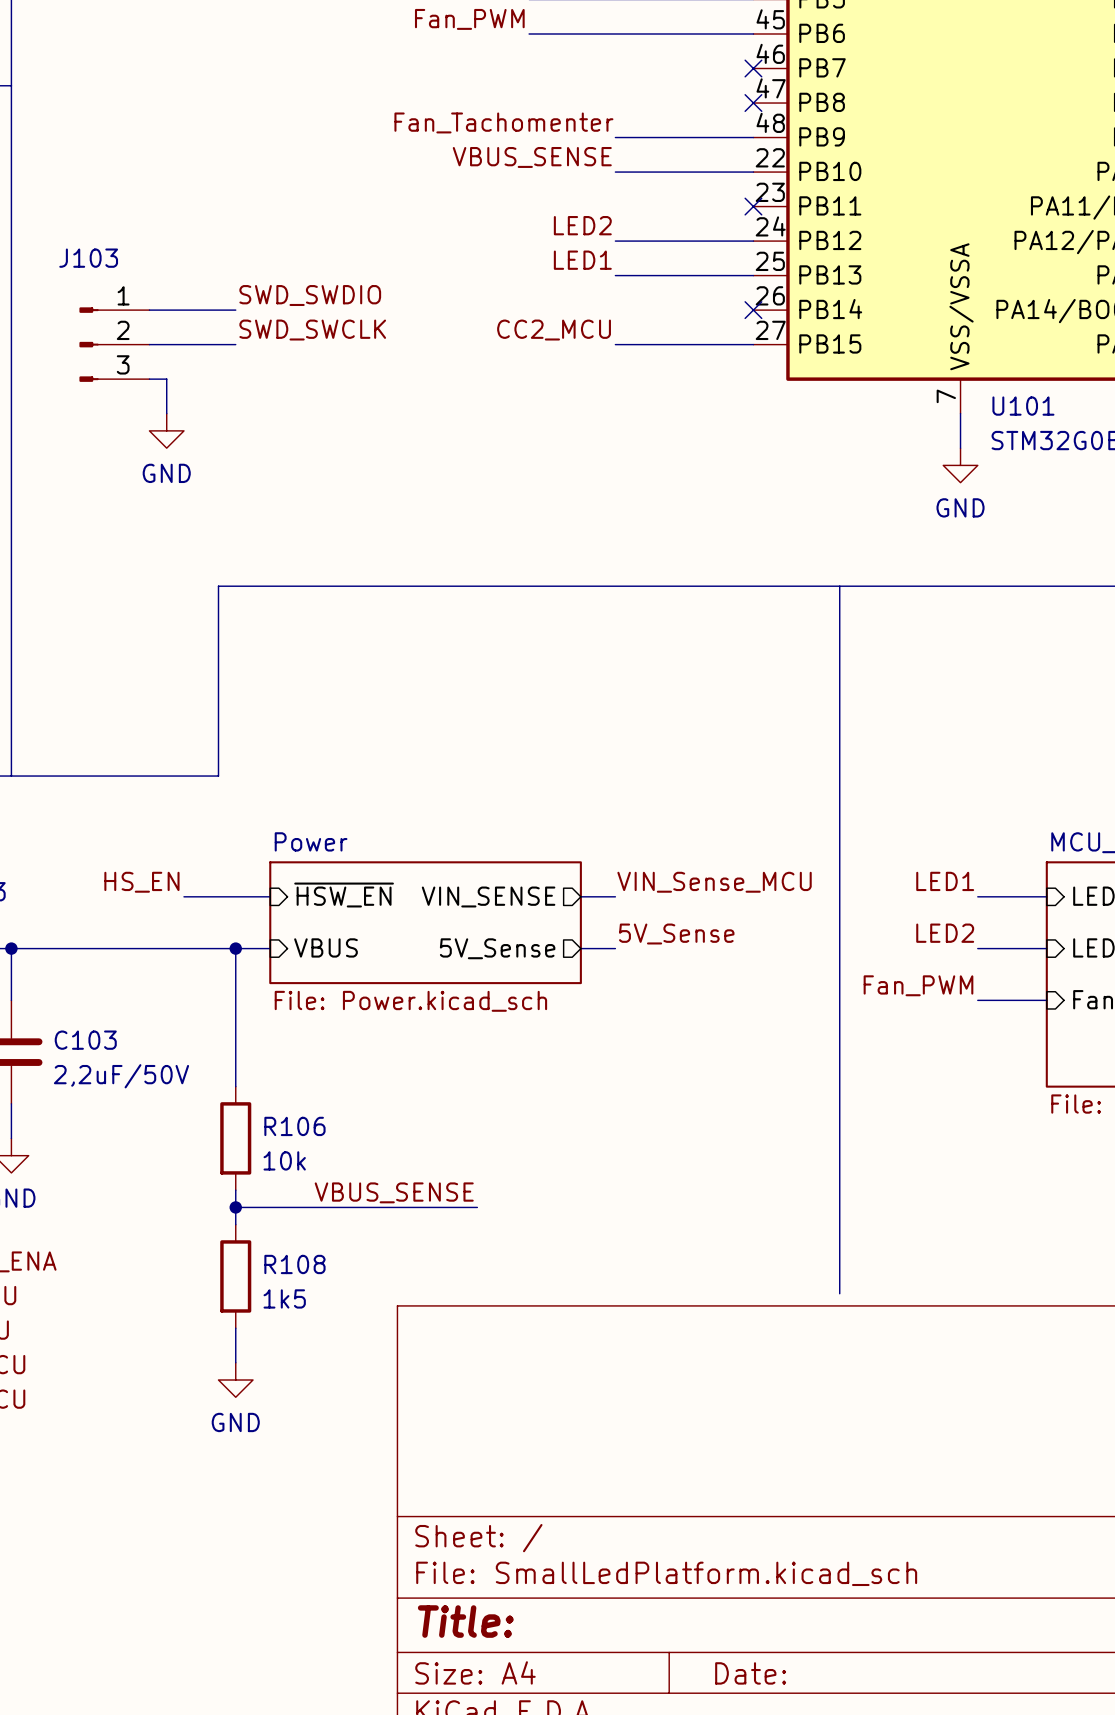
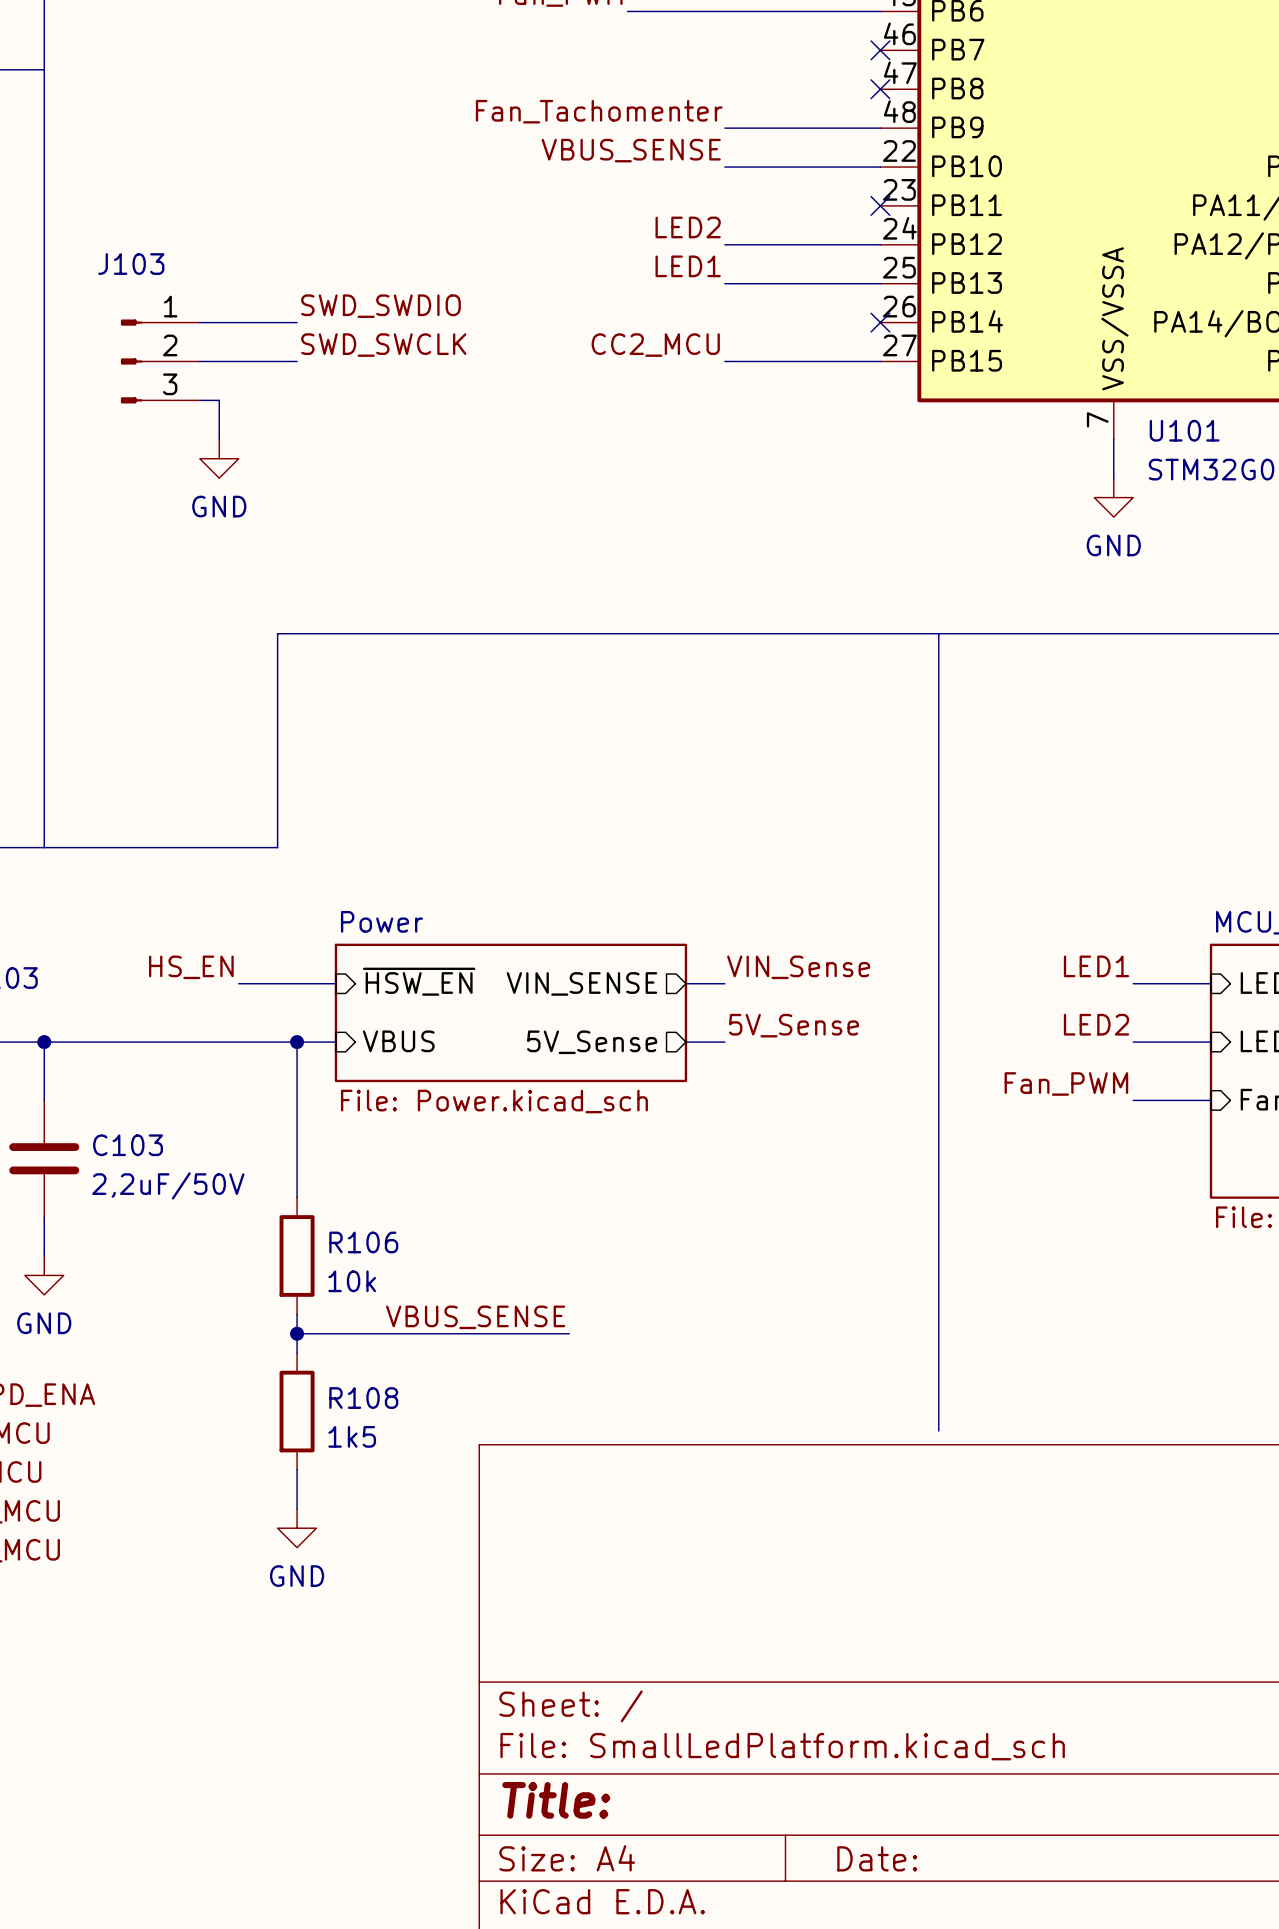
line: (839, 586) (839, 1293) -> (938, 633) (938, 1430)
label: VIN_Sense_MCU (714, 882) -> VIN_Sense (798, 967)

